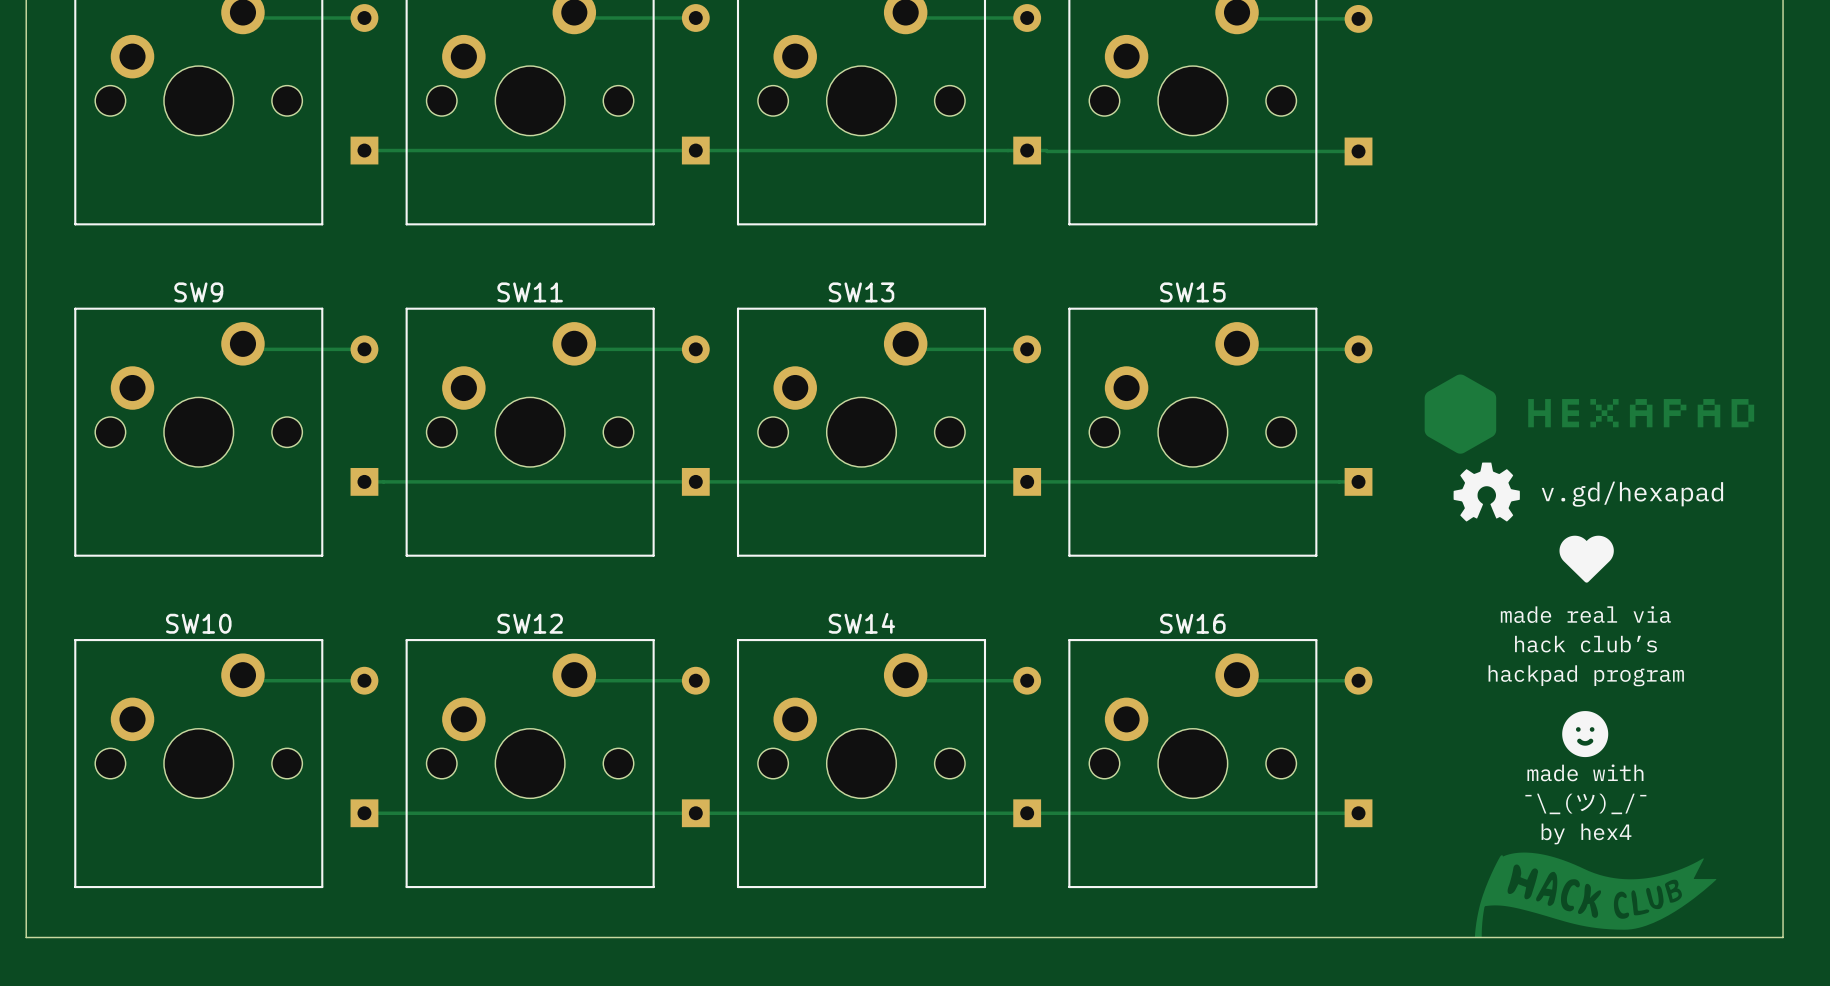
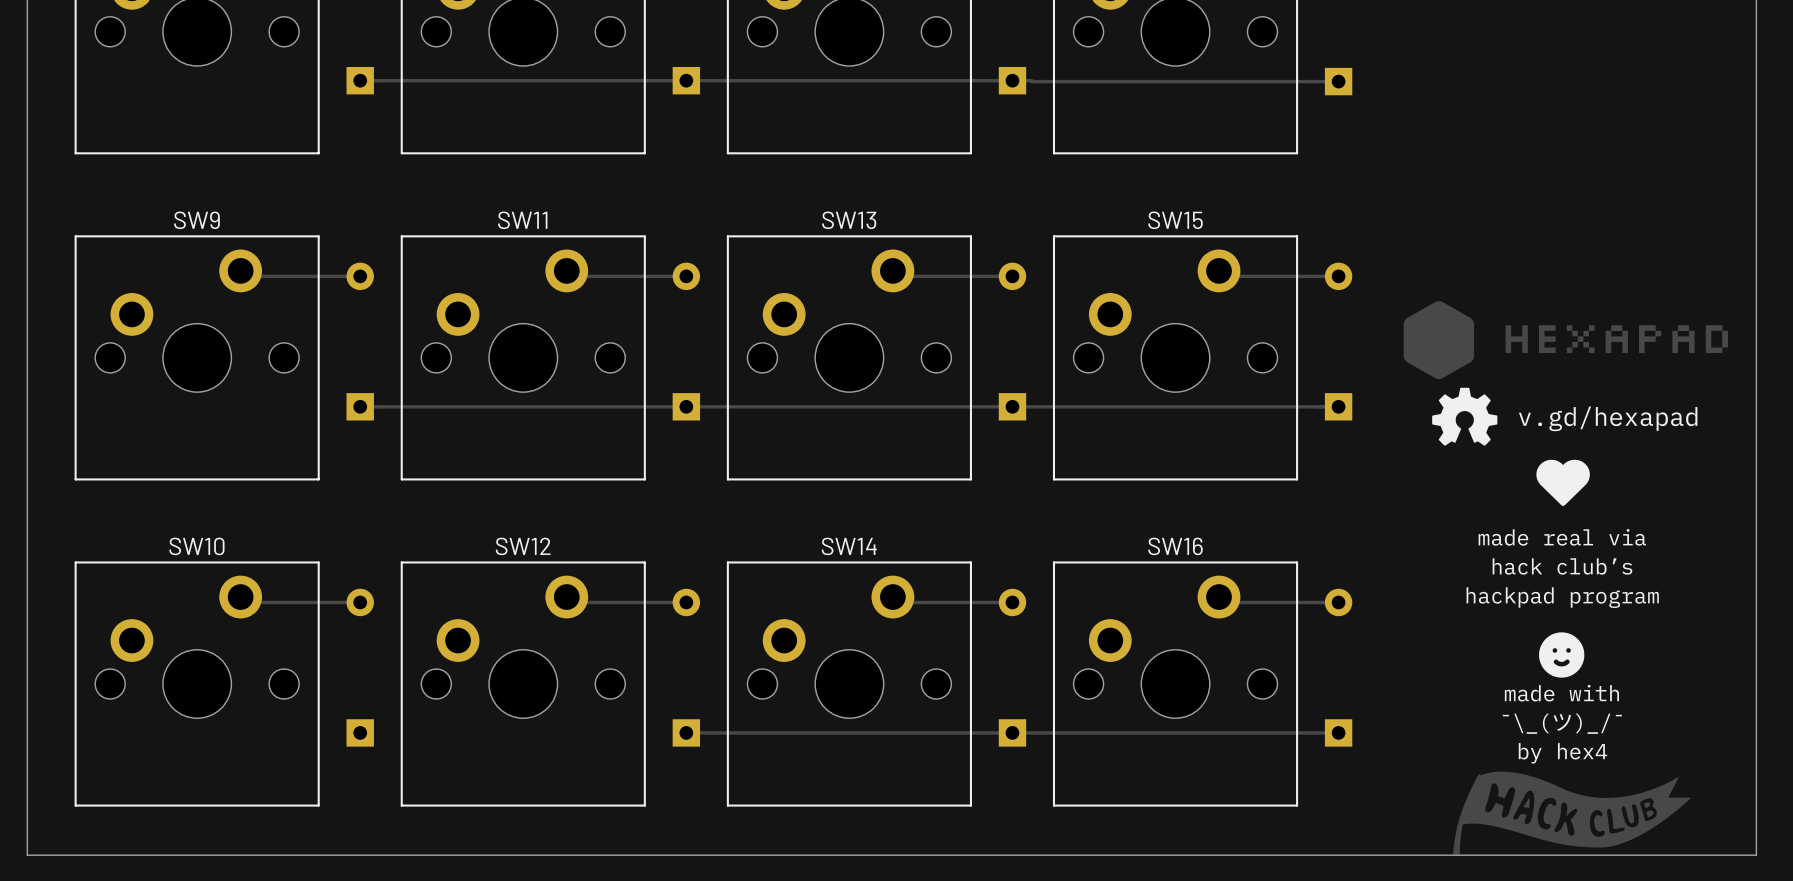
track: (364, 813) (695, 813) -> none

